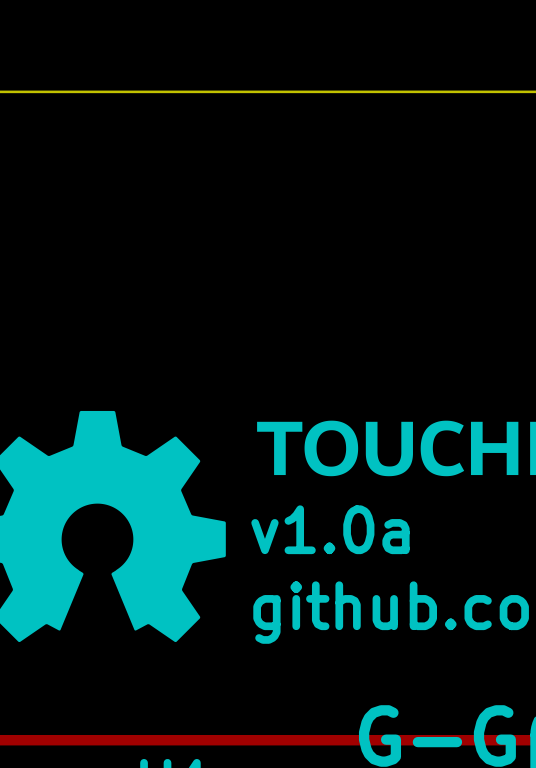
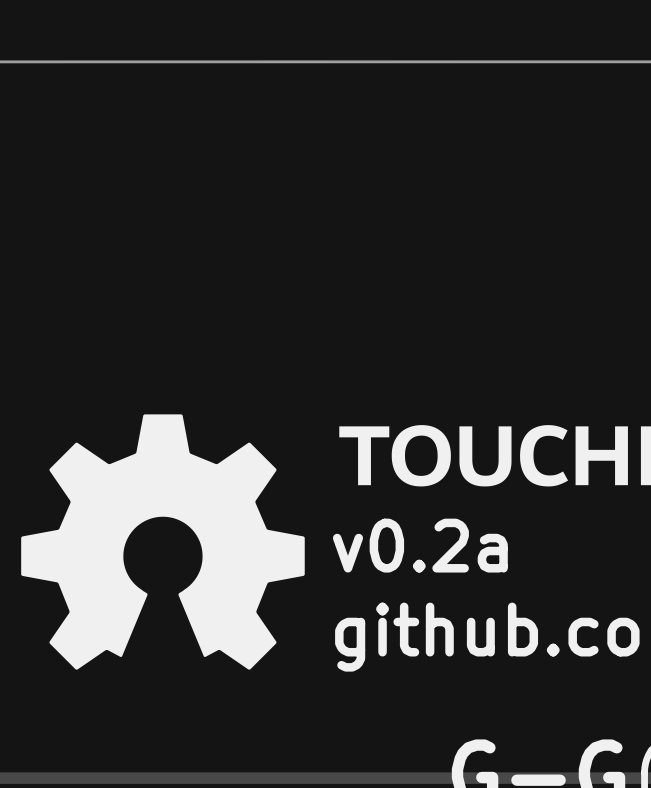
text: v1.0a (330, 529) -> v0.2a (420, 545)

